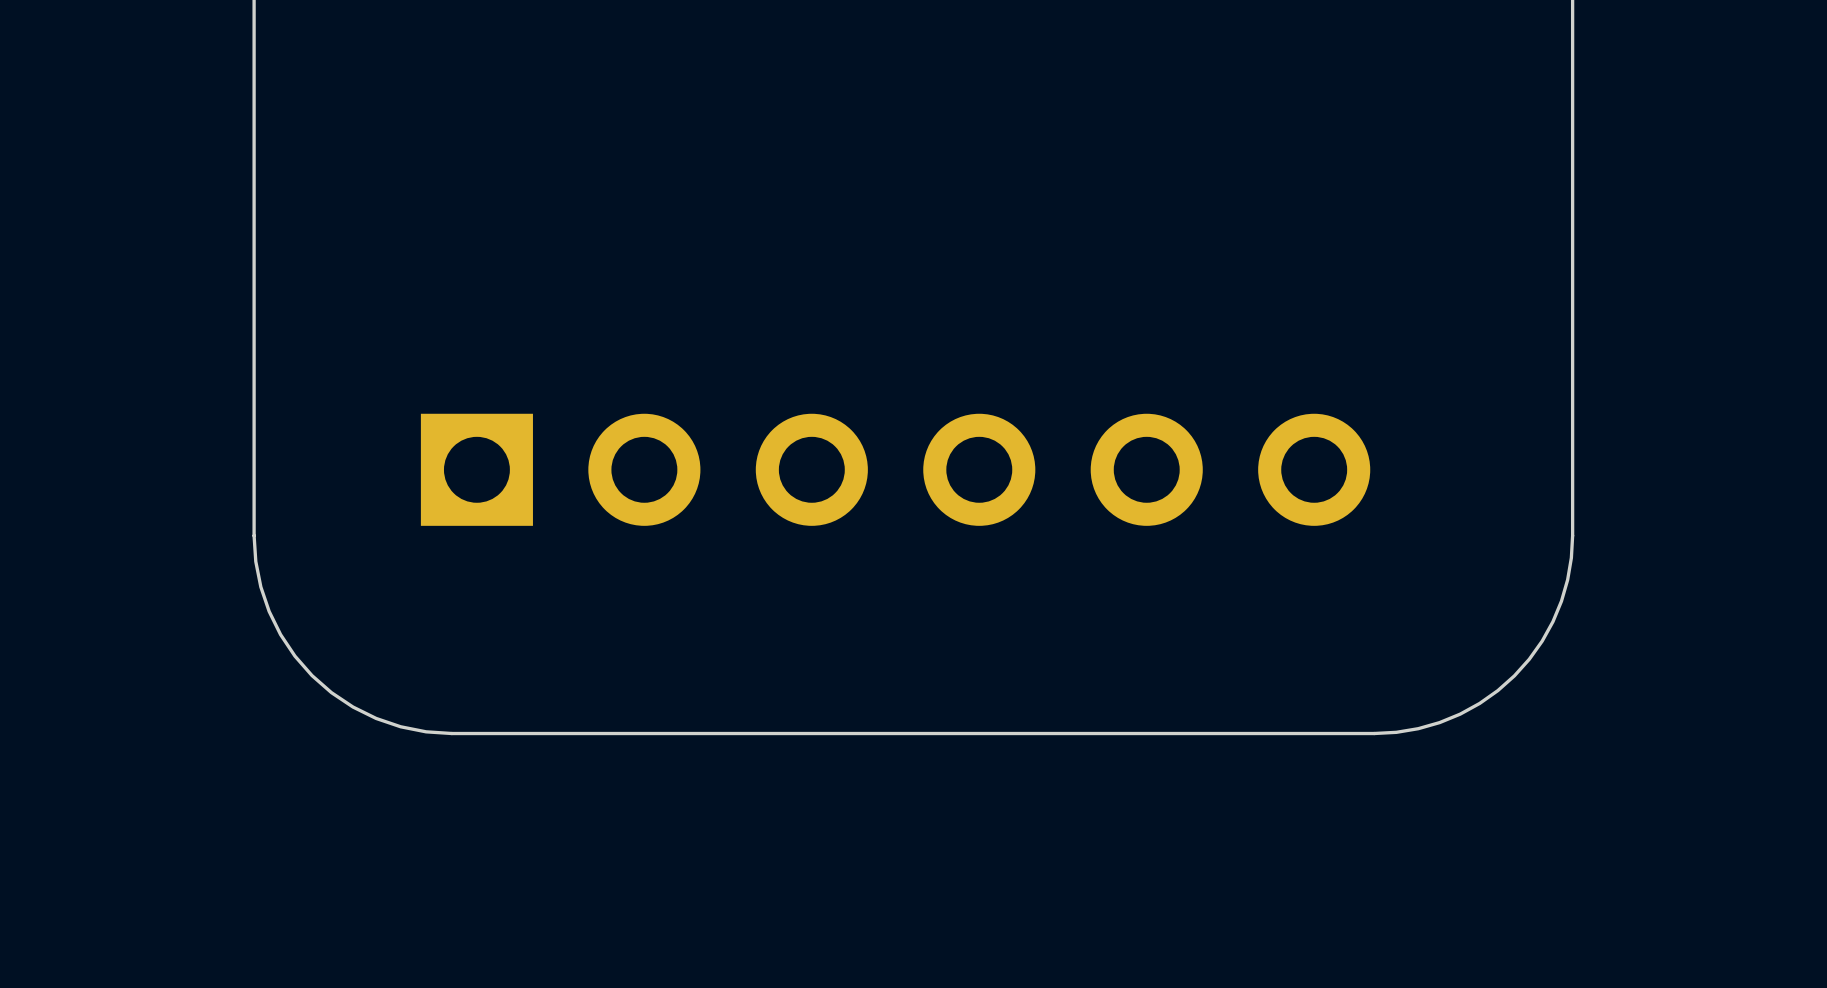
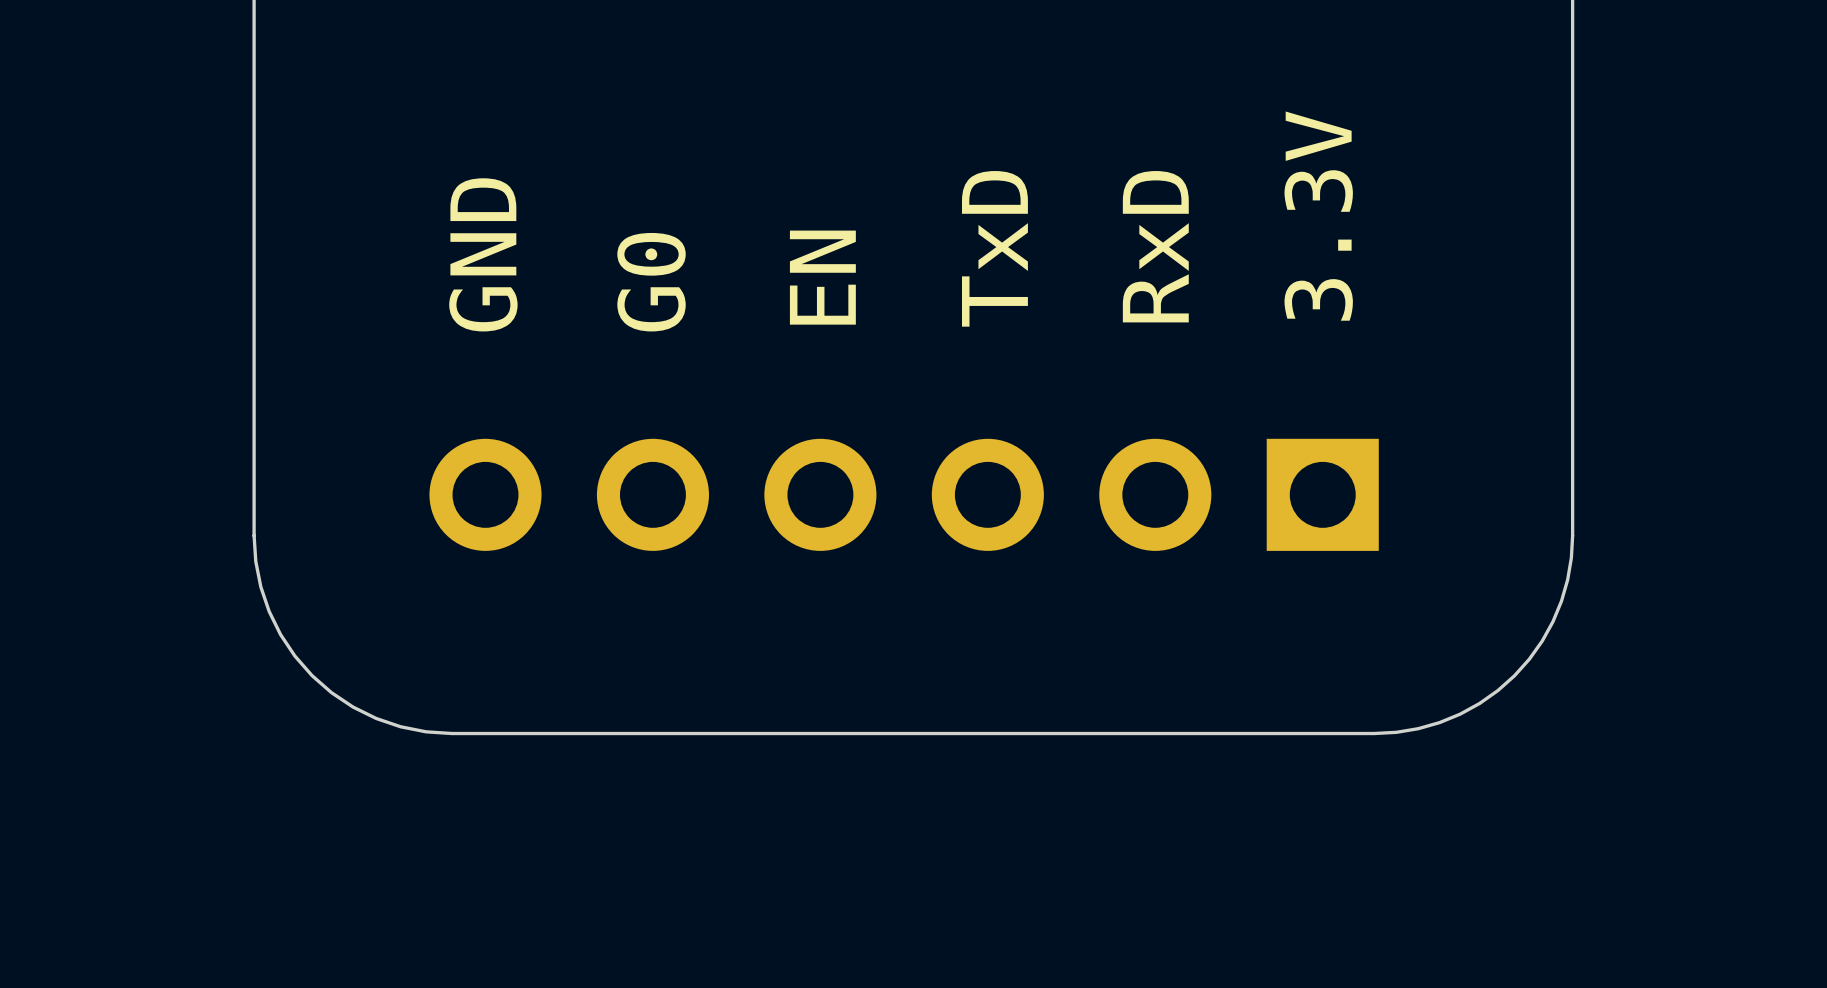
text: none -> 3.3V (1318, 216)
text: none -> RxD (1155, 246)
text: none -> TxD (994, 248)
text: none -> GND (483, 254)
text: none -> EN (822, 277)
text: none -> G0 (651, 282)
part rotation: 0° (895, 469) -> 180° (904, 494)

